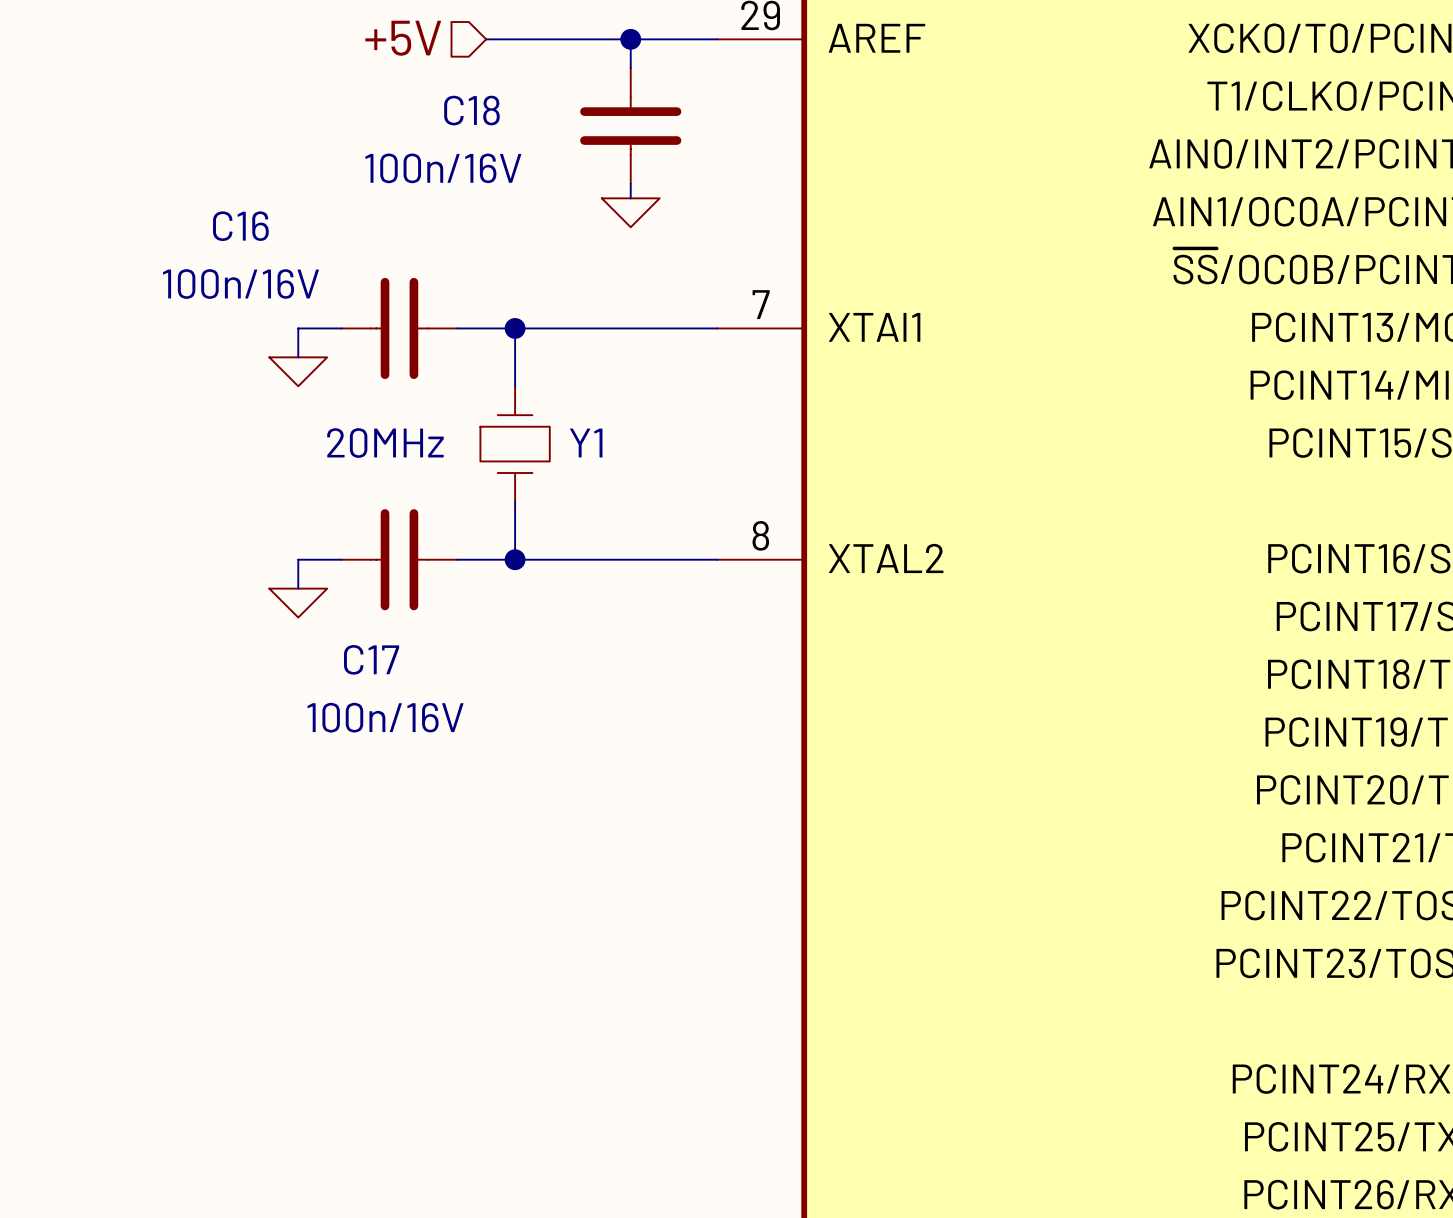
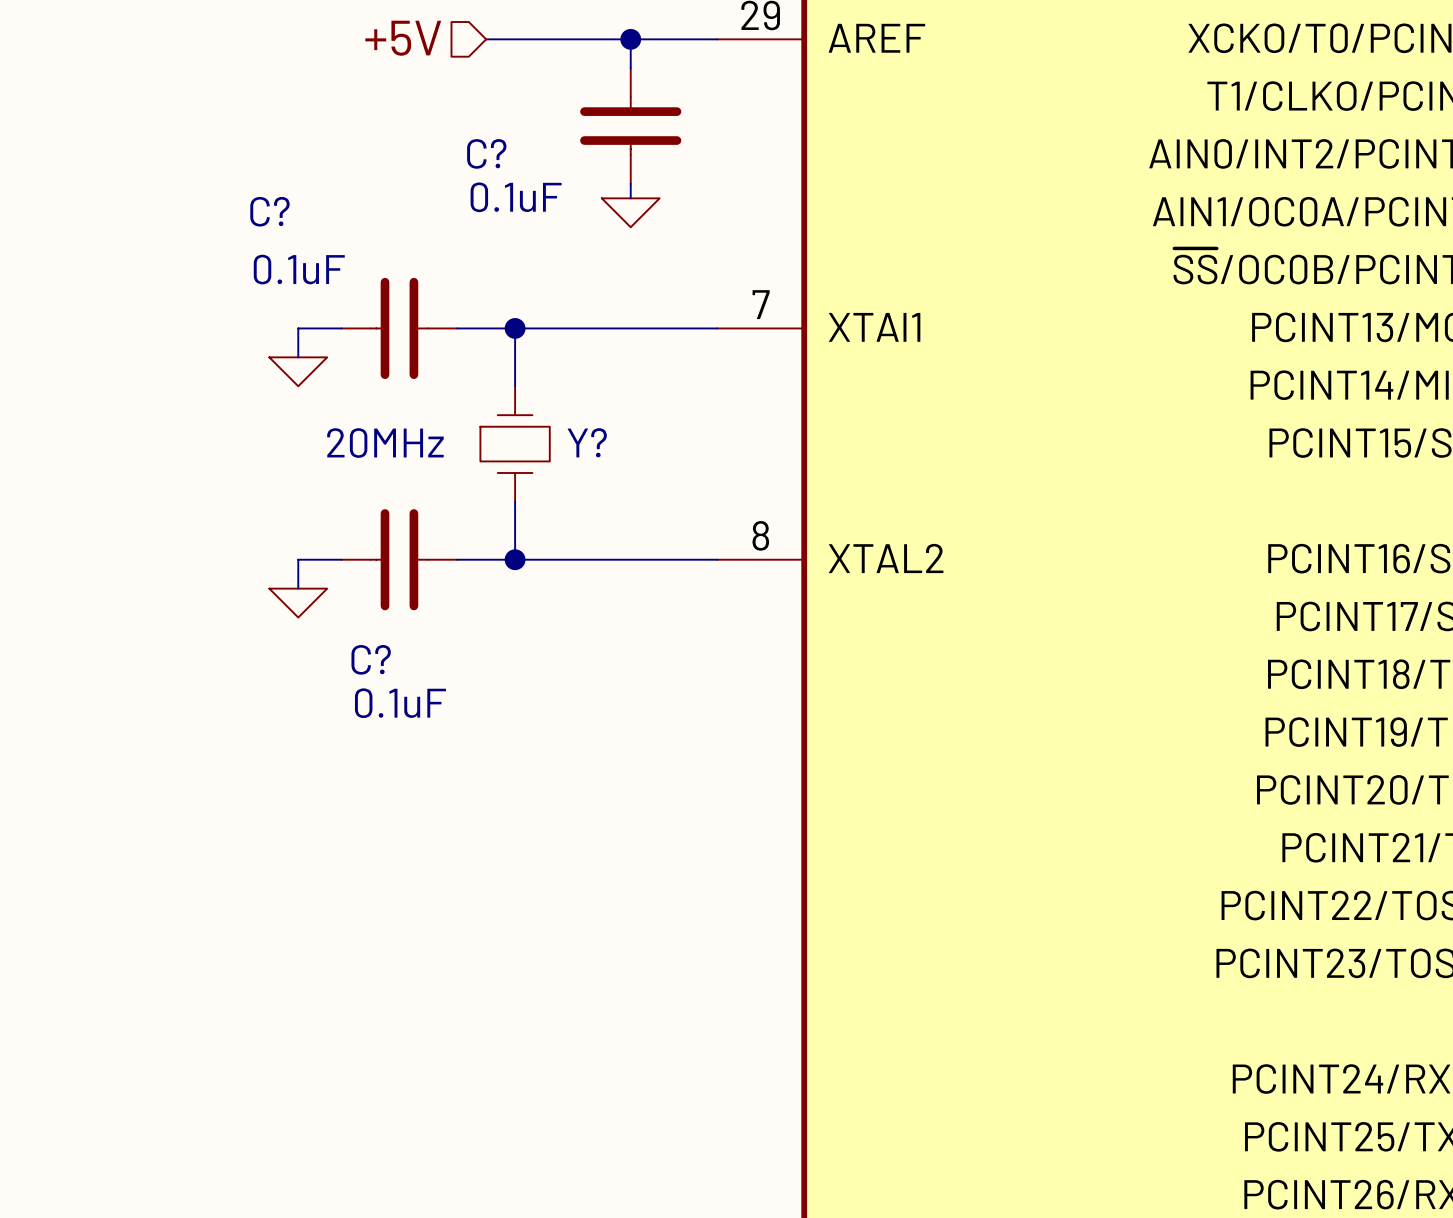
C18 name: C18 (471, 110) -> C? (486, 153)
C18 value: 100n/16V (443, 168) -> 0.1uF (516, 197)
C16 name: C16 (240, 226) -> C? (269, 211)
C16 value: 100n/16V (240, 284) -> 0.1uF (299, 269)
Y1 name: Y1 (586, 443) -> Y? (587, 442)
C17 name: C17 (371, 659) -> C? (371, 659)
C17 value: 100n/16V (385, 717) -> 0.1uF (400, 703)

